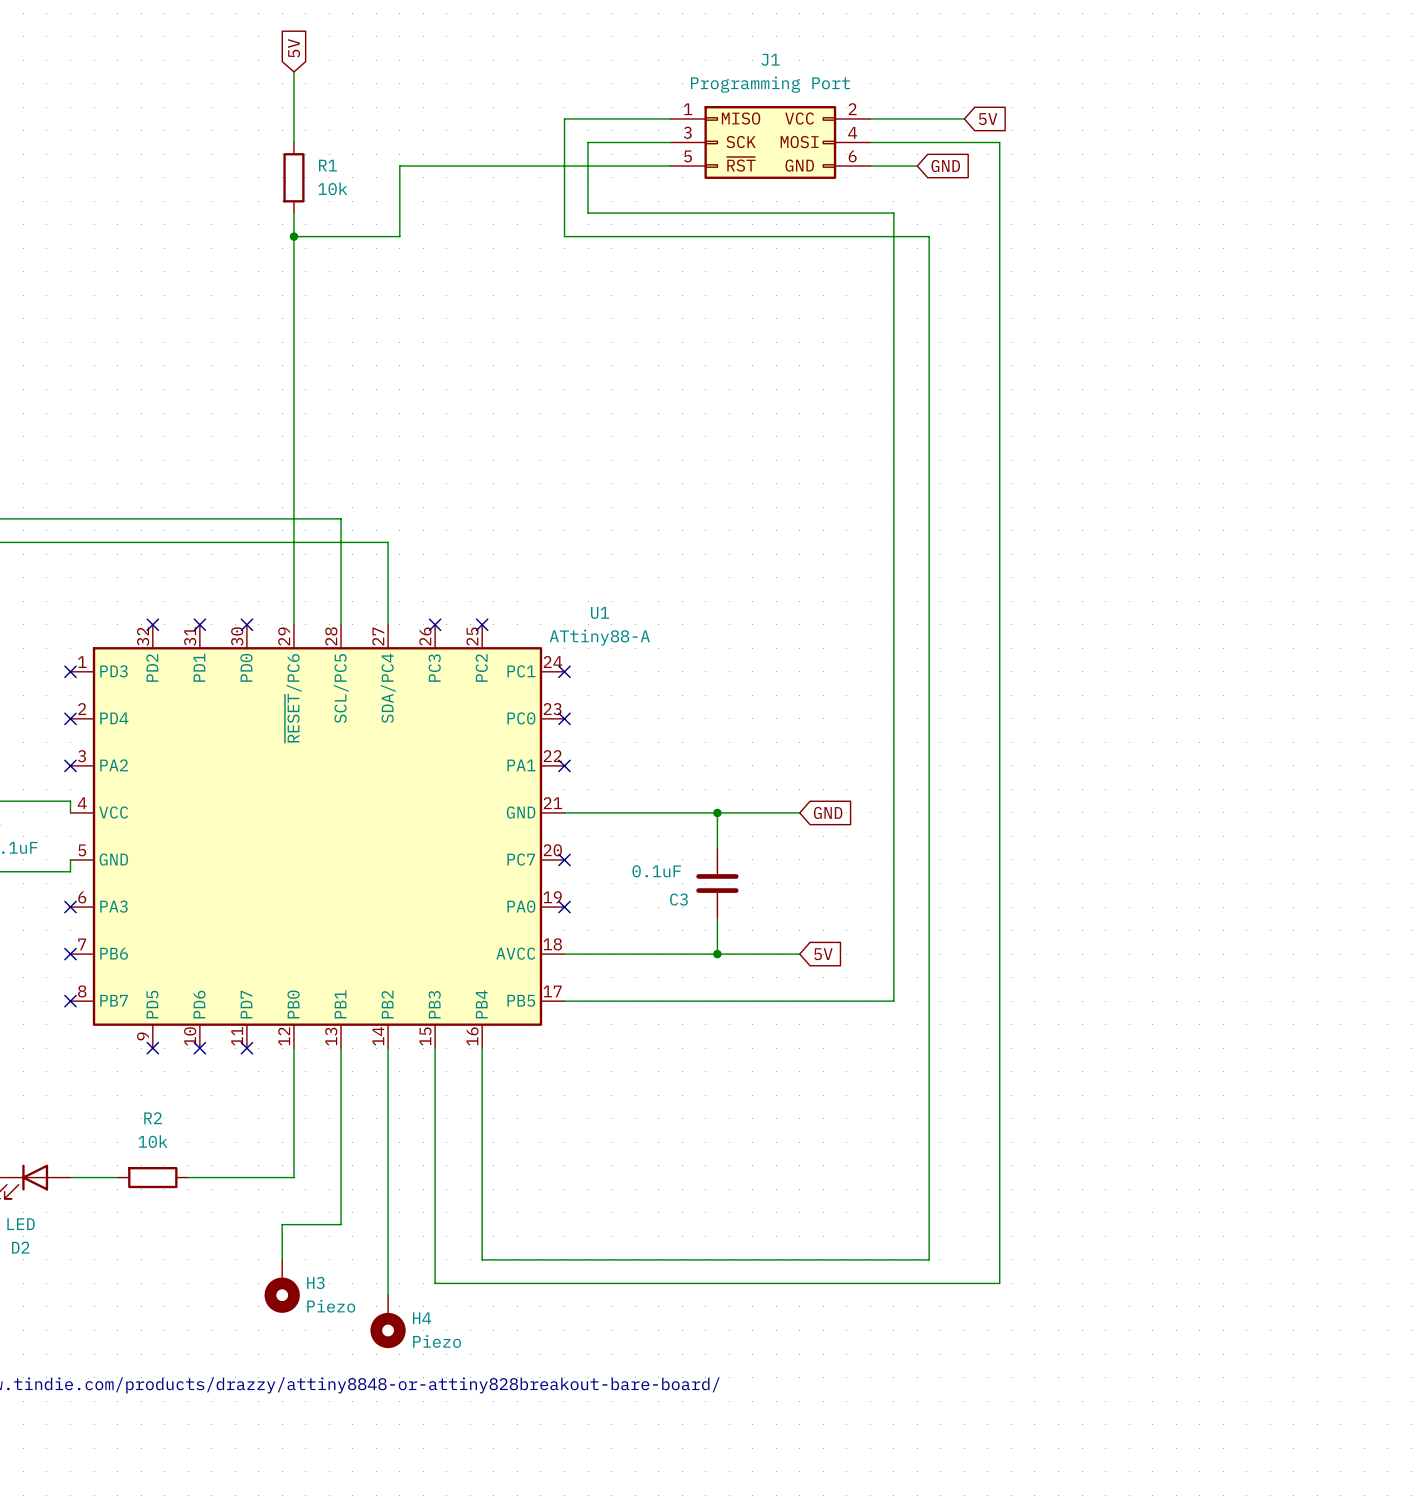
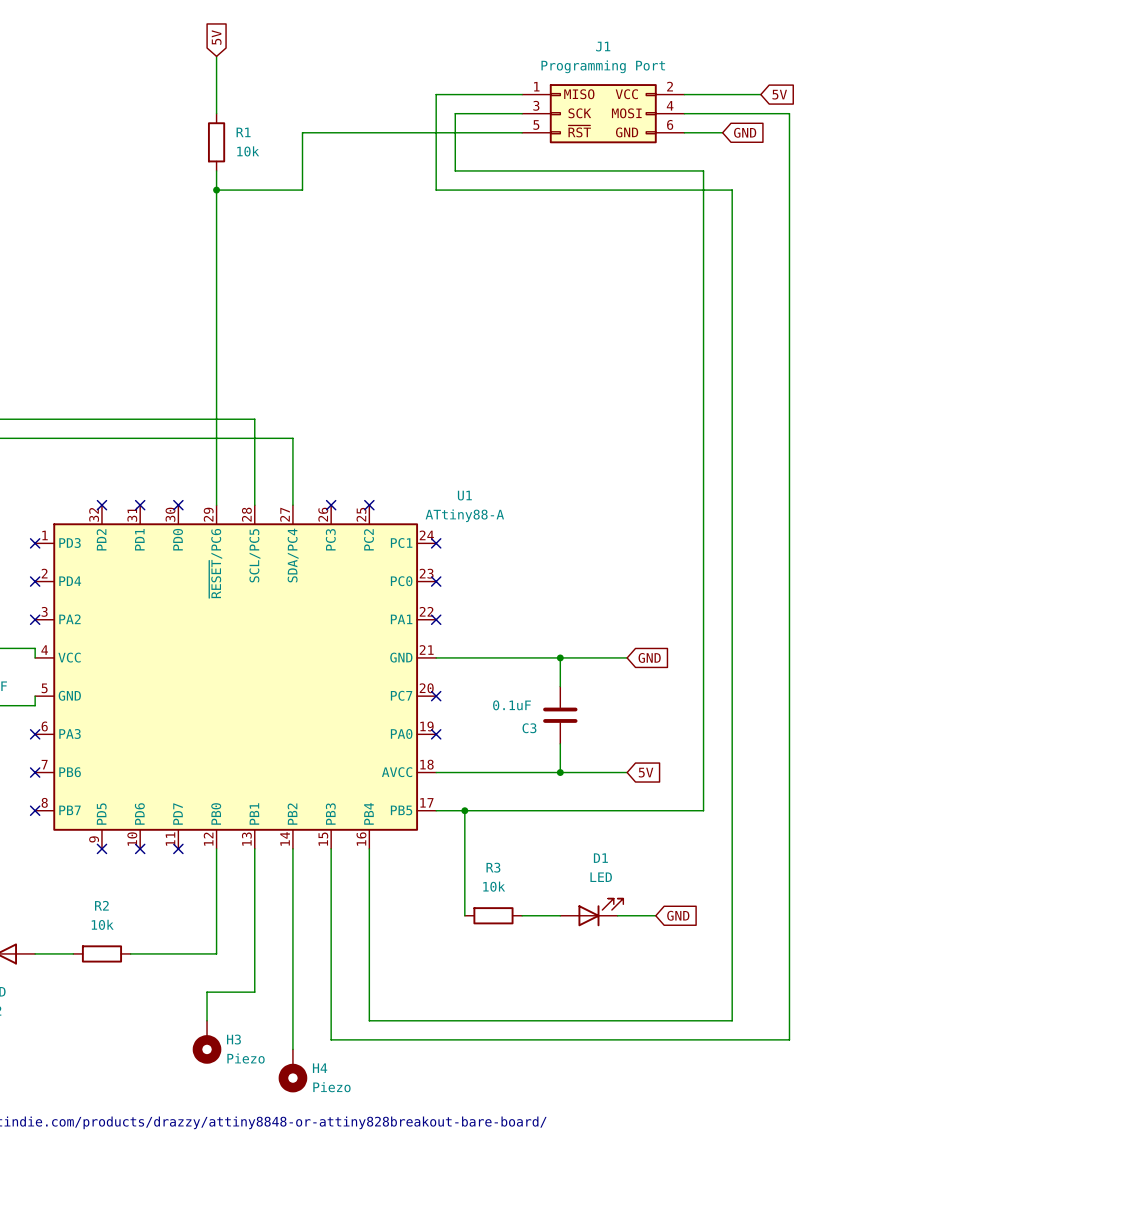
wire: none -> (464, 810) (464, 915)
junction: none -> (464, 810)
D1: none -> LED (591, 912)
R3: none -> 10k (493, 915)
wire: none -> (522, 915) (560, 915)
wire: none -> (617, 915) (655, 915)
global label: none -> GND (678, 915)

